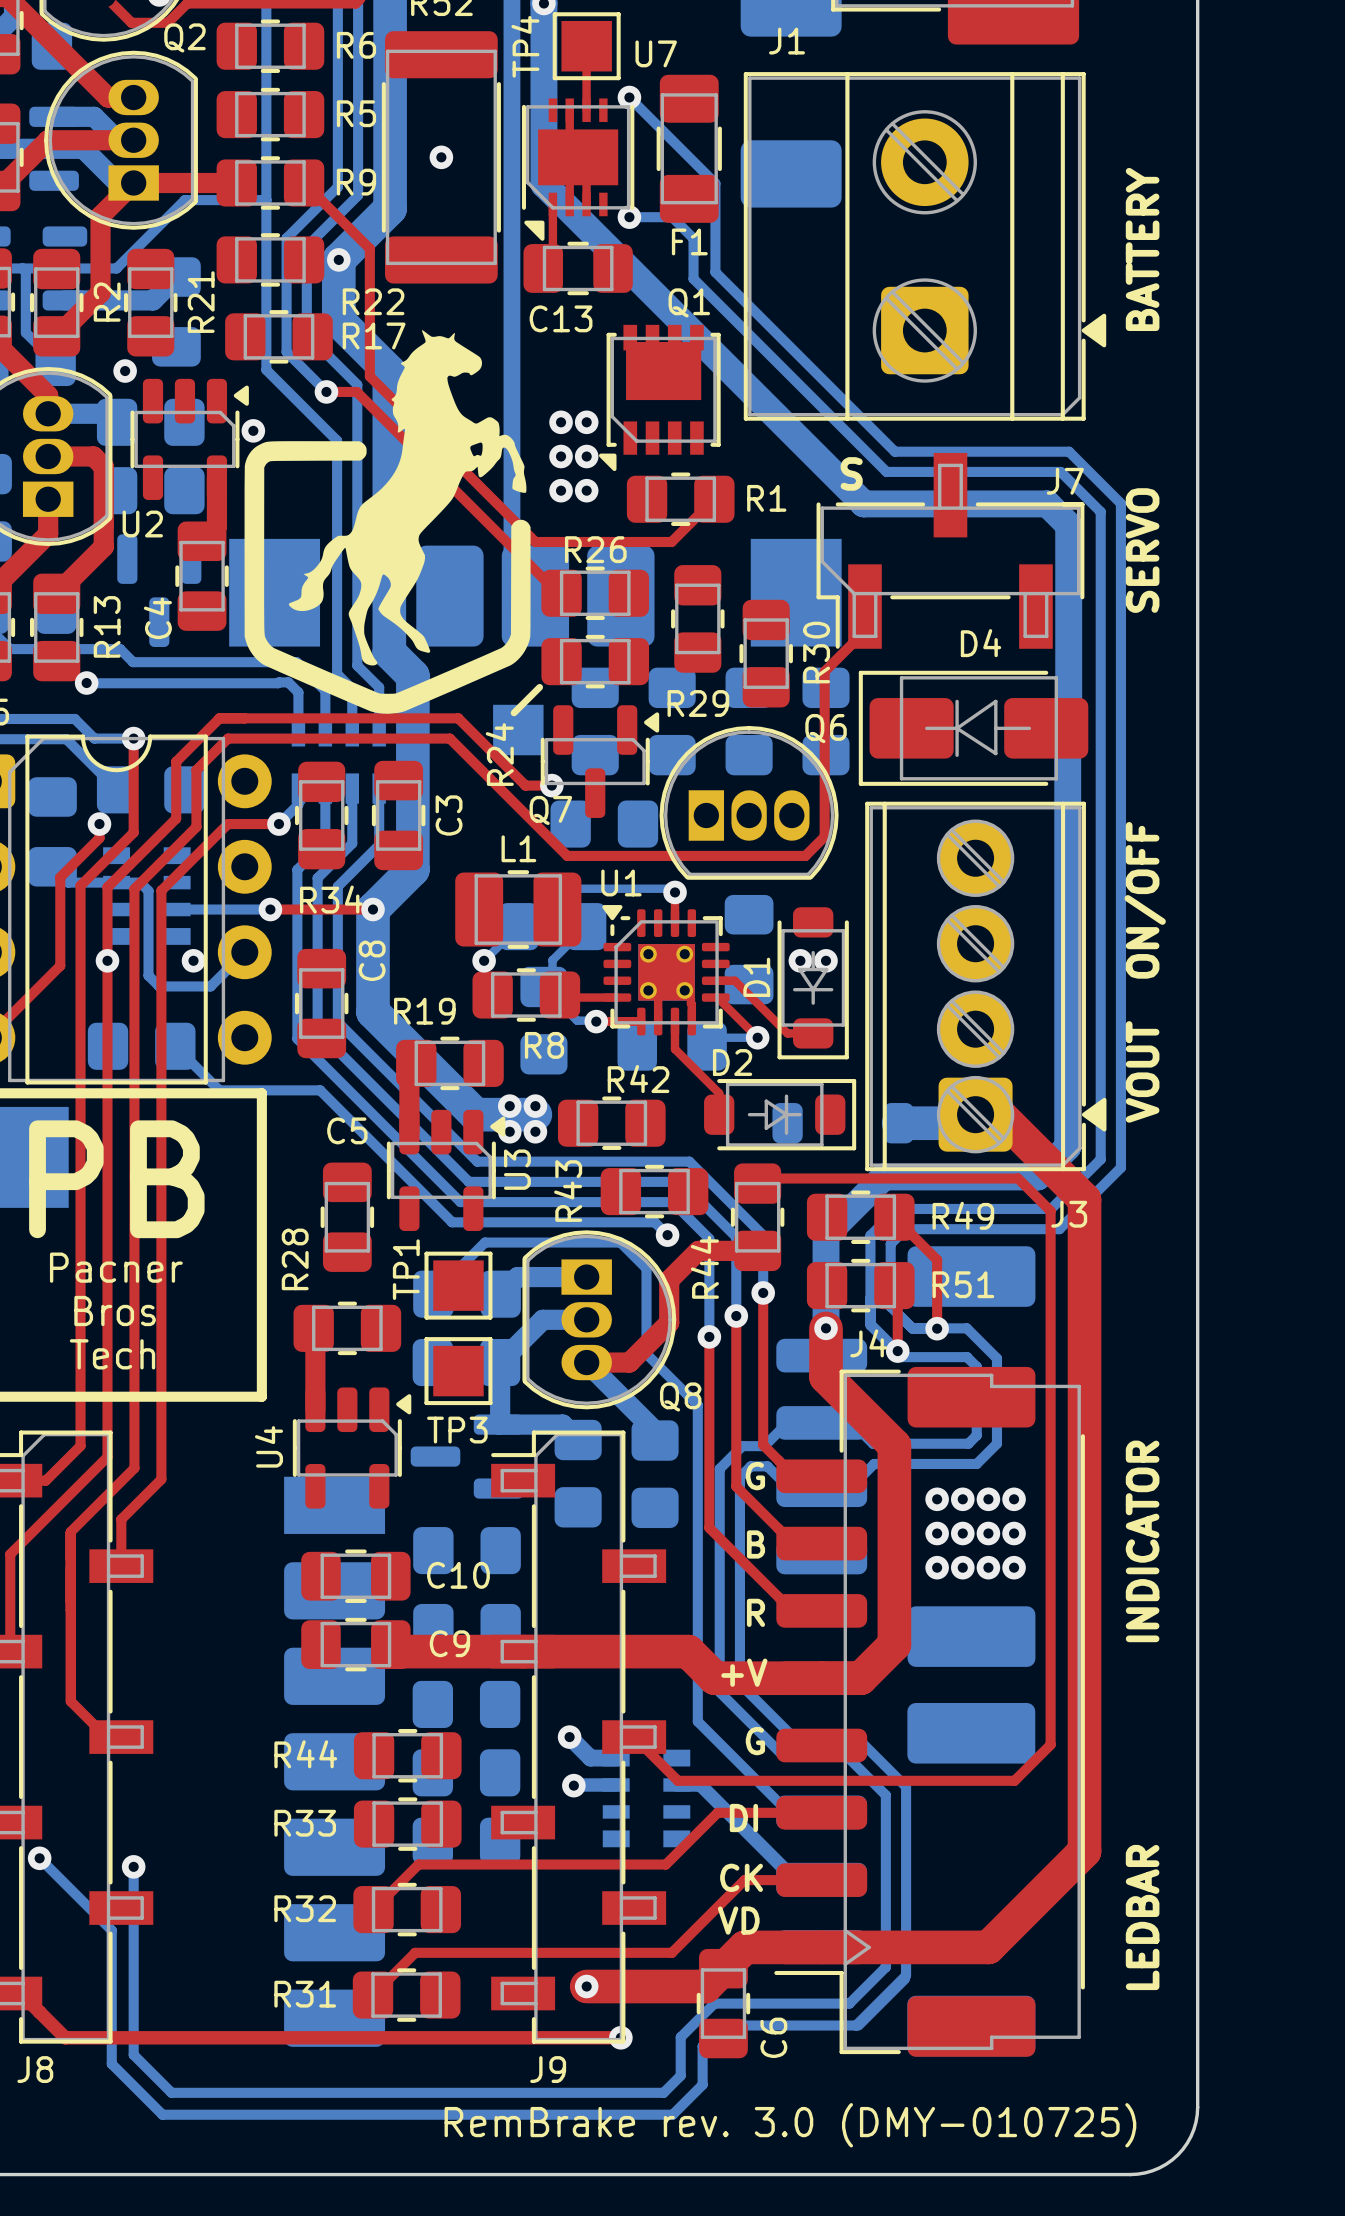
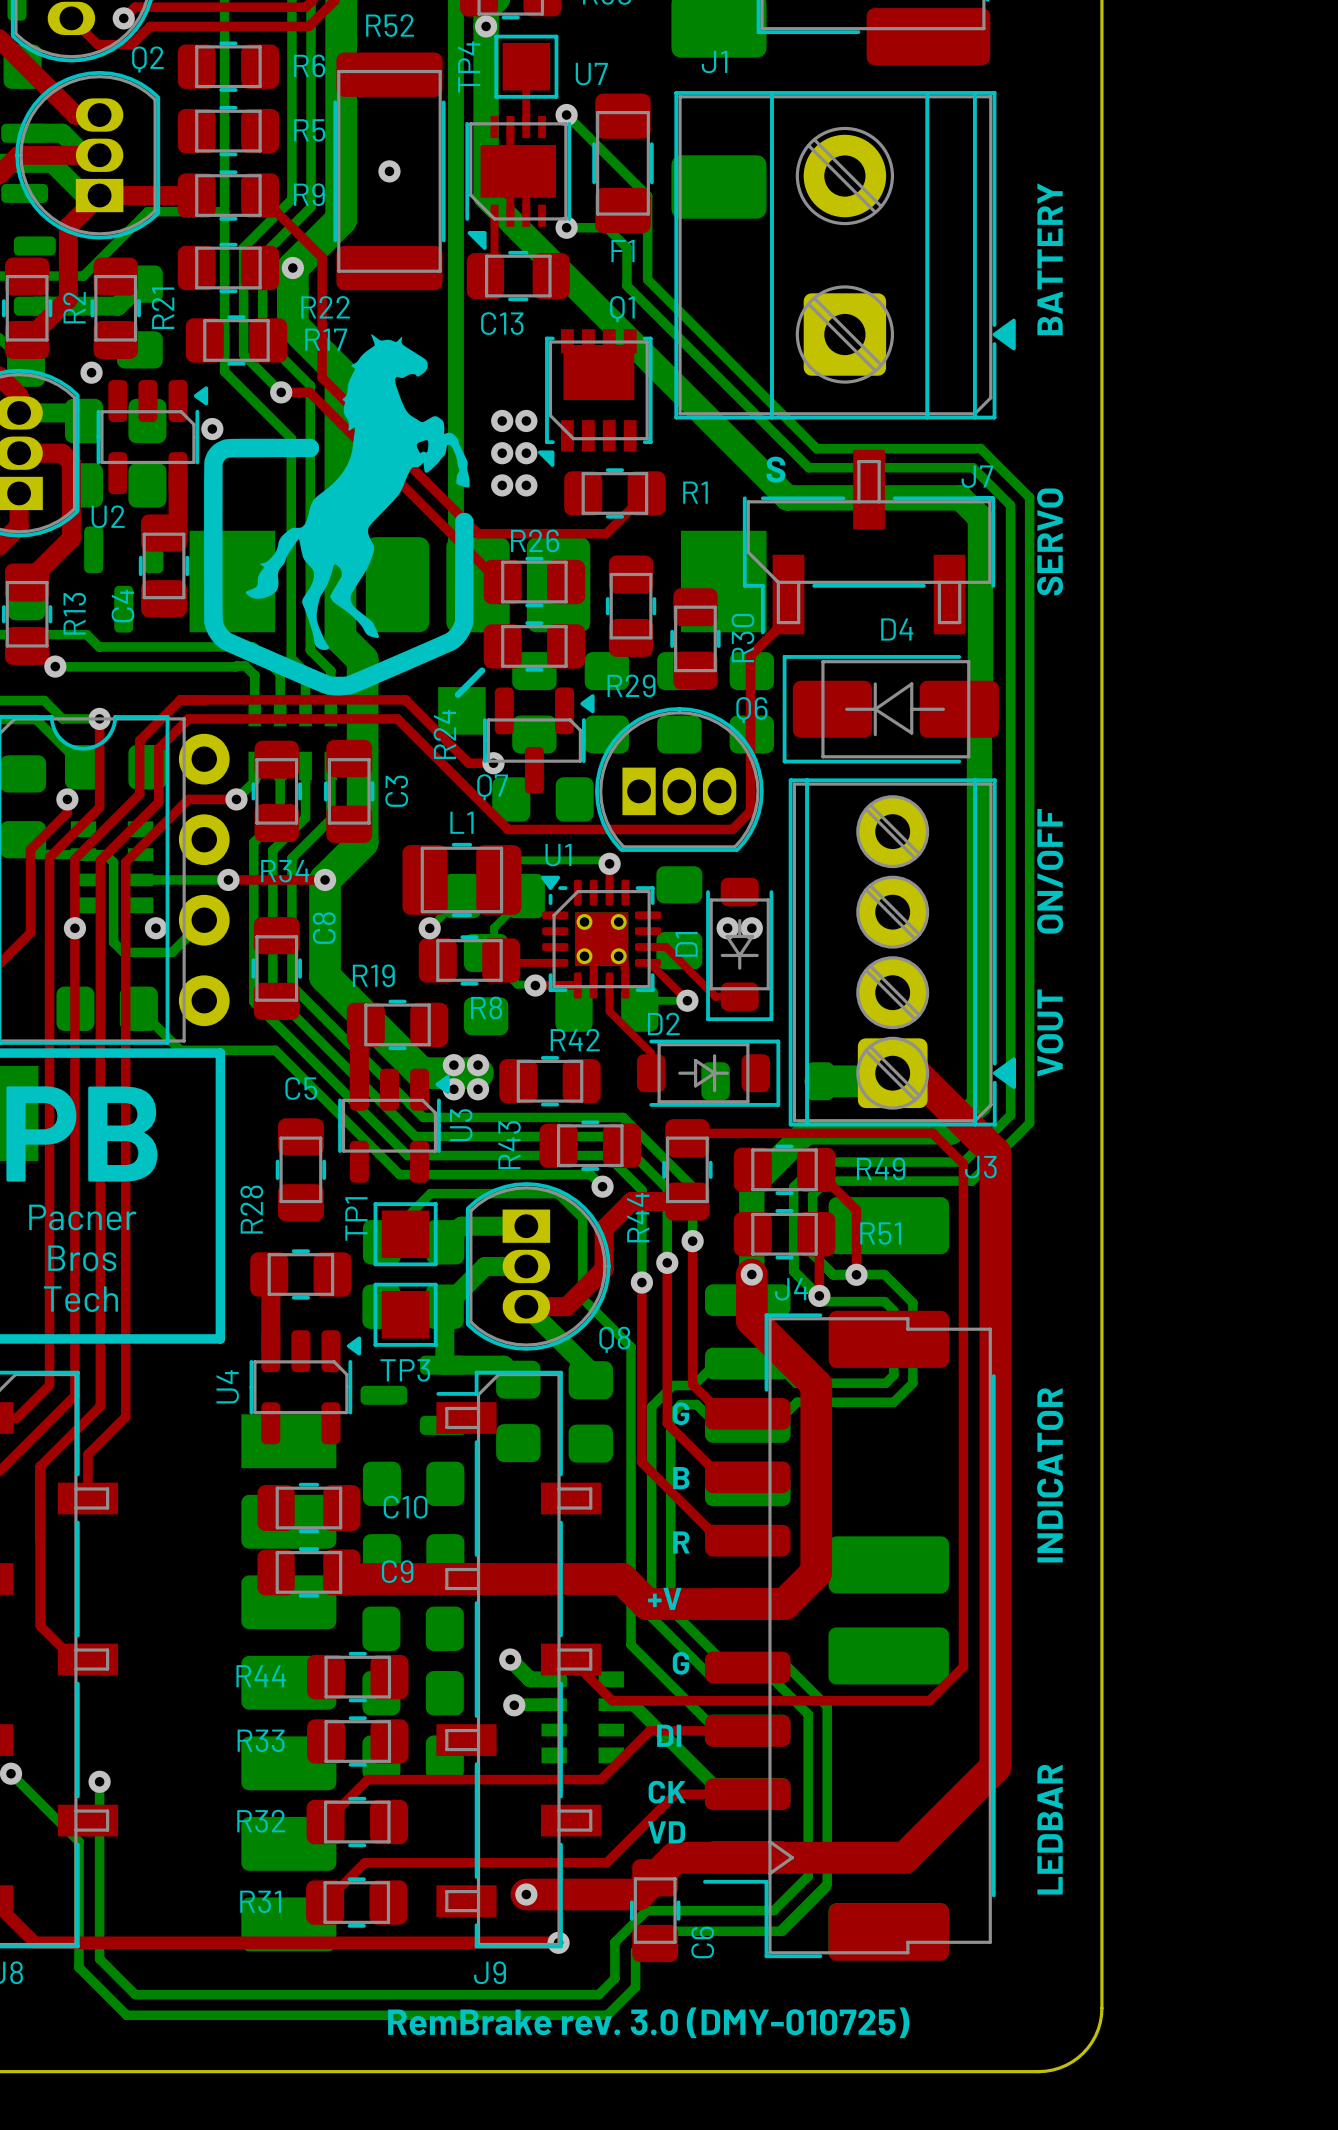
via: (937, 1499) -> none
via: (962, 1499) -> none
via: (988, 1499) -> none
via: (1014, 1499) -> none
via: (937, 1533) -> none
via: (962, 1533) -> none
via: (988, 1533) -> none
via: (1014, 1533) -> none
via: (937, 1567) -> none
via: (962, 1567) -> none
via: (988, 1567) -> none
via: (1014, 1567) -> none

